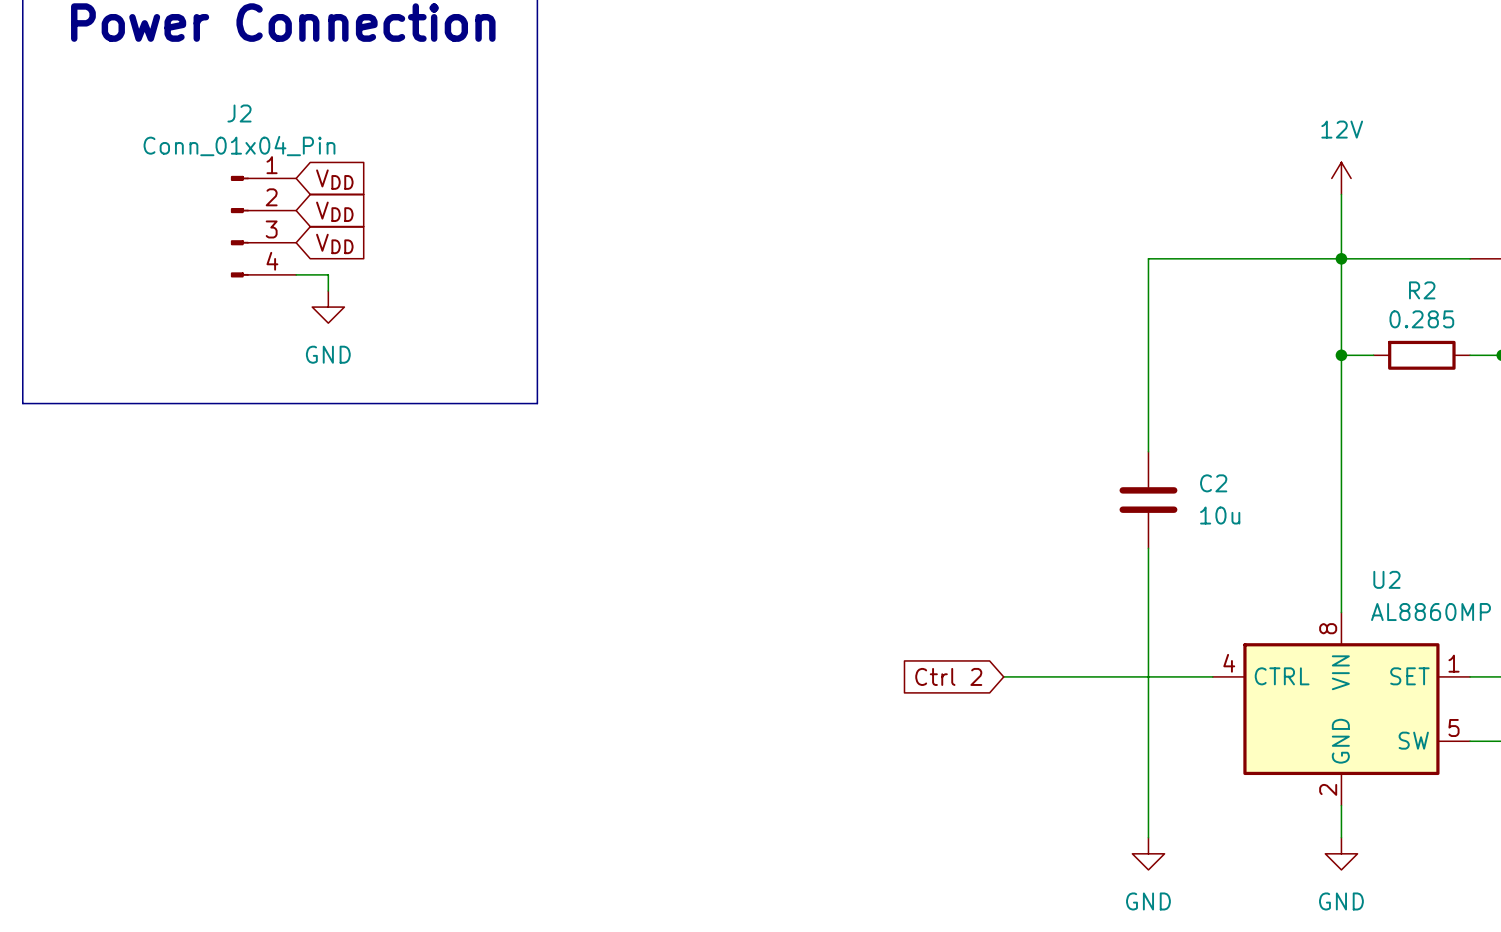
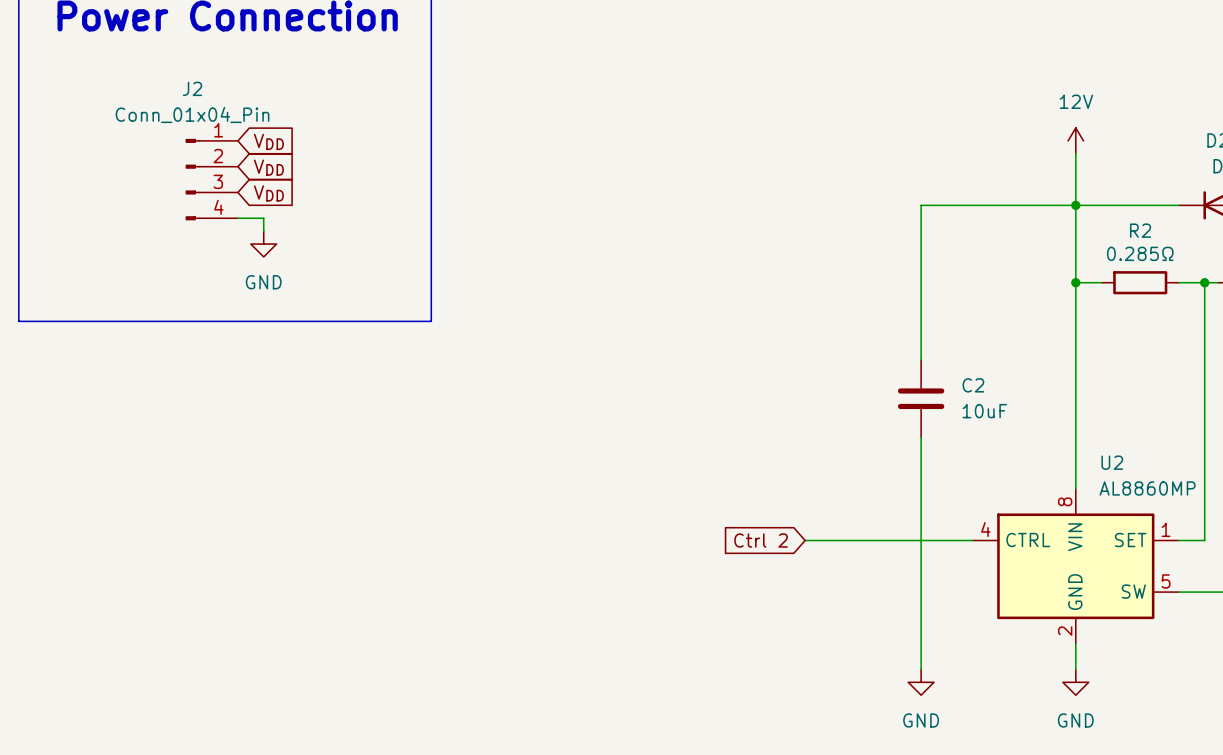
R2 value: 0.285 (1421, 319) -> 0.285Ω (1140, 253)
C2 value: 10u (1220, 515) -> 10uF (984, 411)

